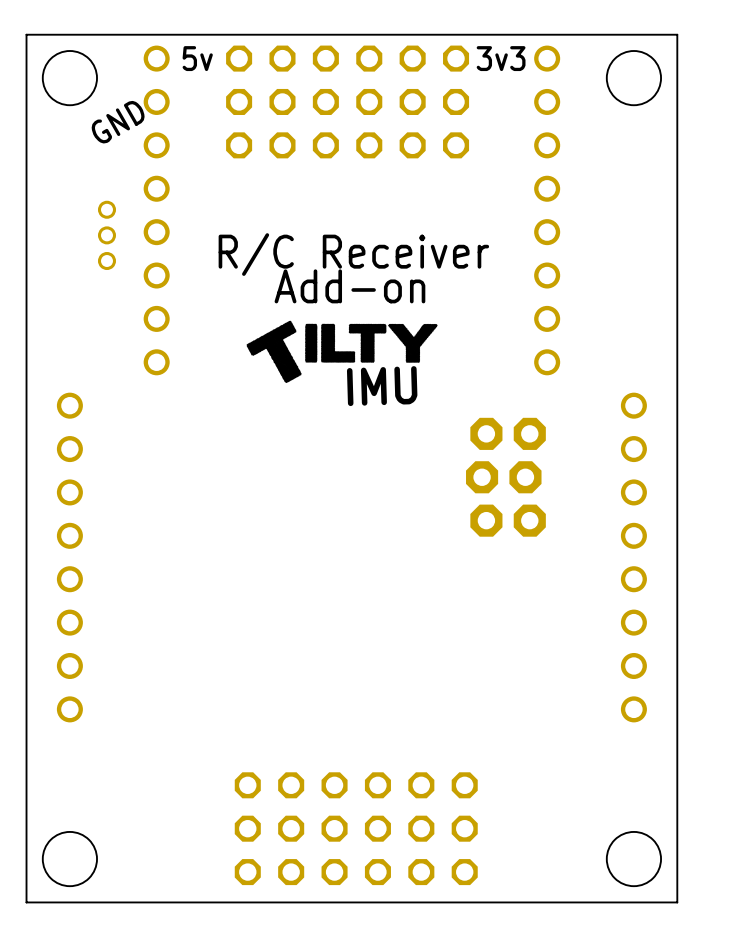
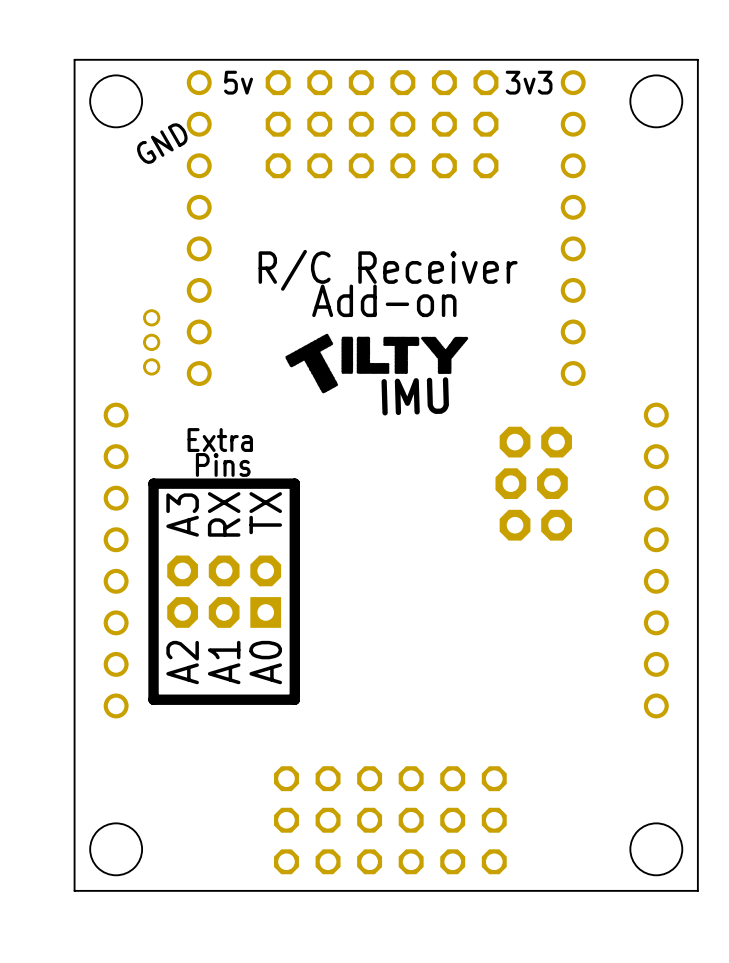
part position: (106, 235) -> (151, 342)
text: none -> Extra (220, 440)
text: none -> Pins (223, 464)
line: none -> (294, 483) (294, 699) (153, 699) (153, 483) (294, 483)
text: none -> TX (265, 513)
text: none -> RX (224, 514)
text: none -> A3 (182, 515)
part: none -> (224, 591)
text: none -> A2 (182, 662)
text: none -> A1 (224, 662)
text: none -> A0 (265, 662)

